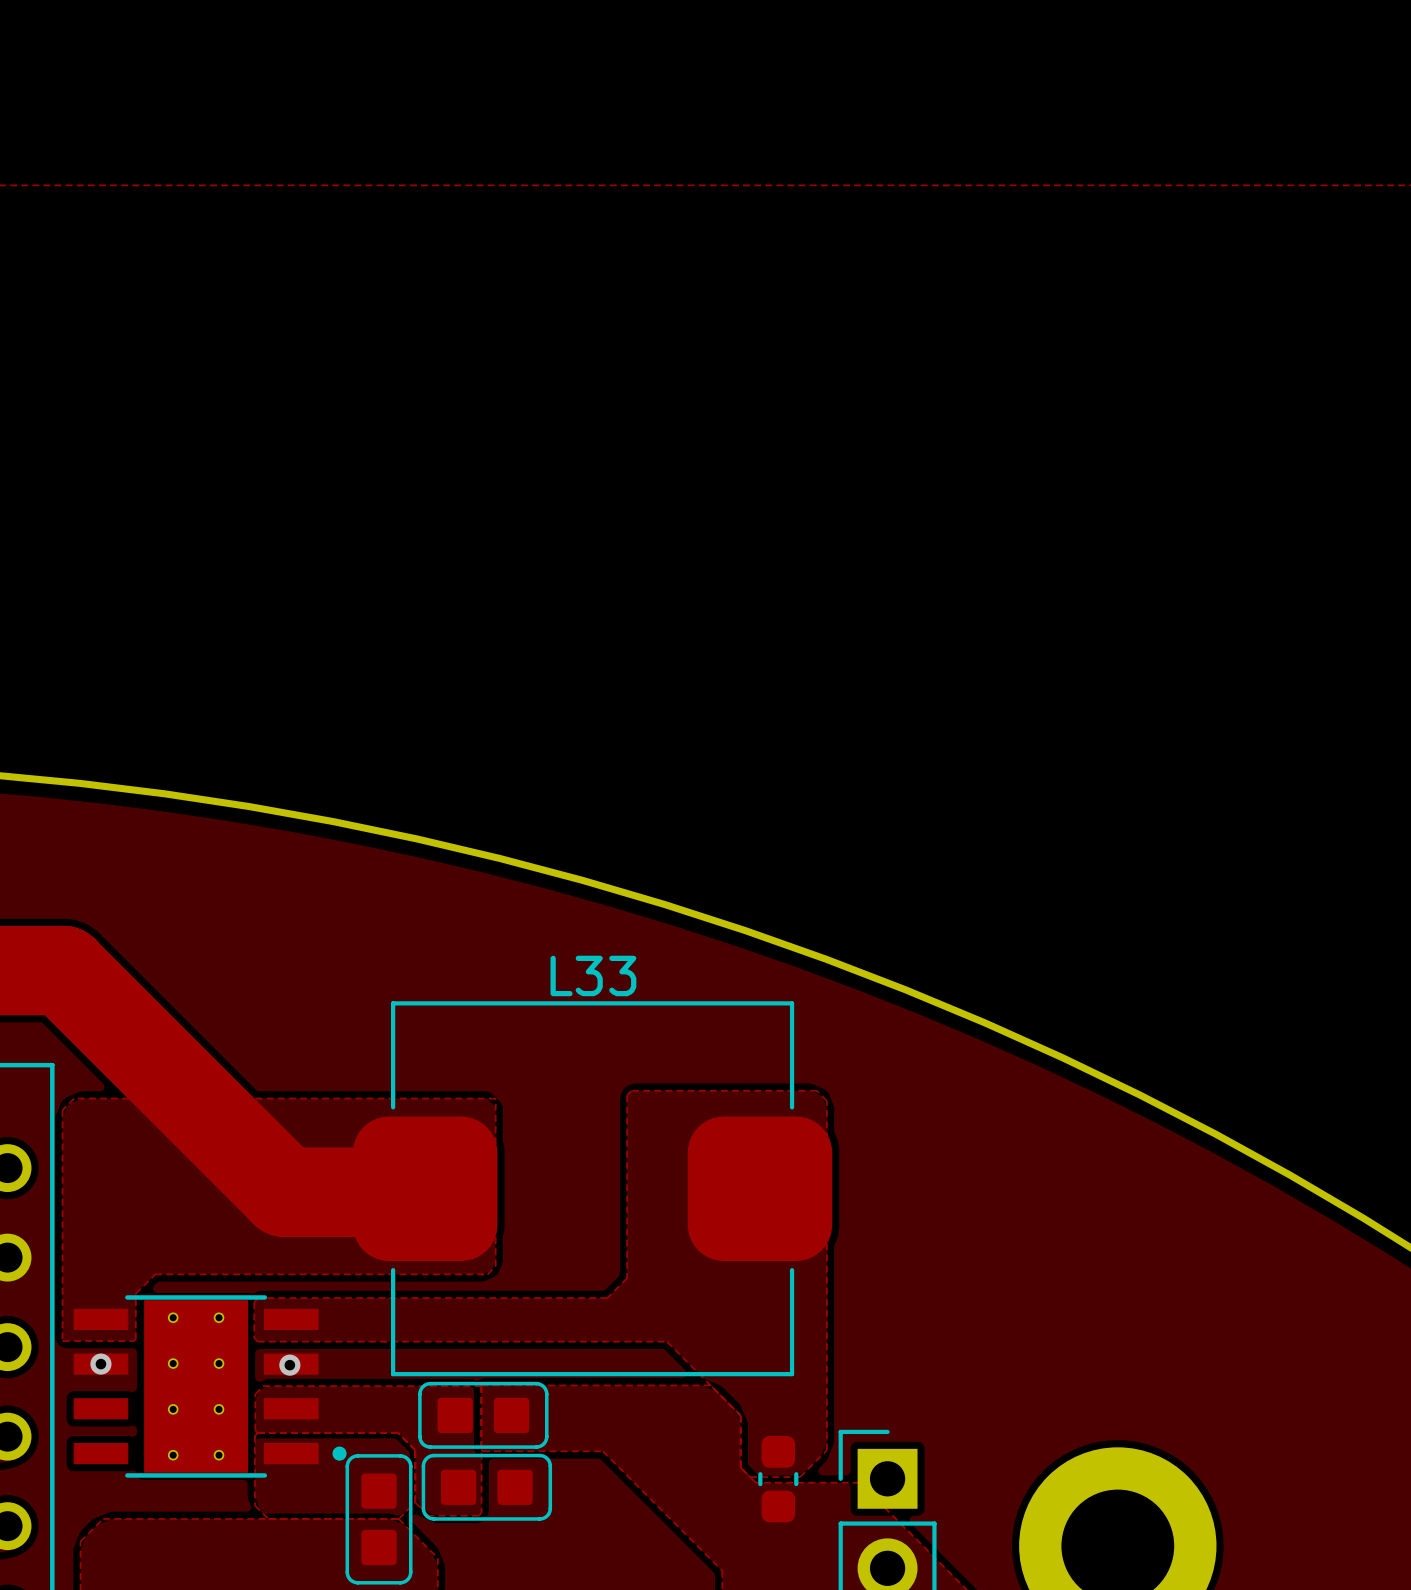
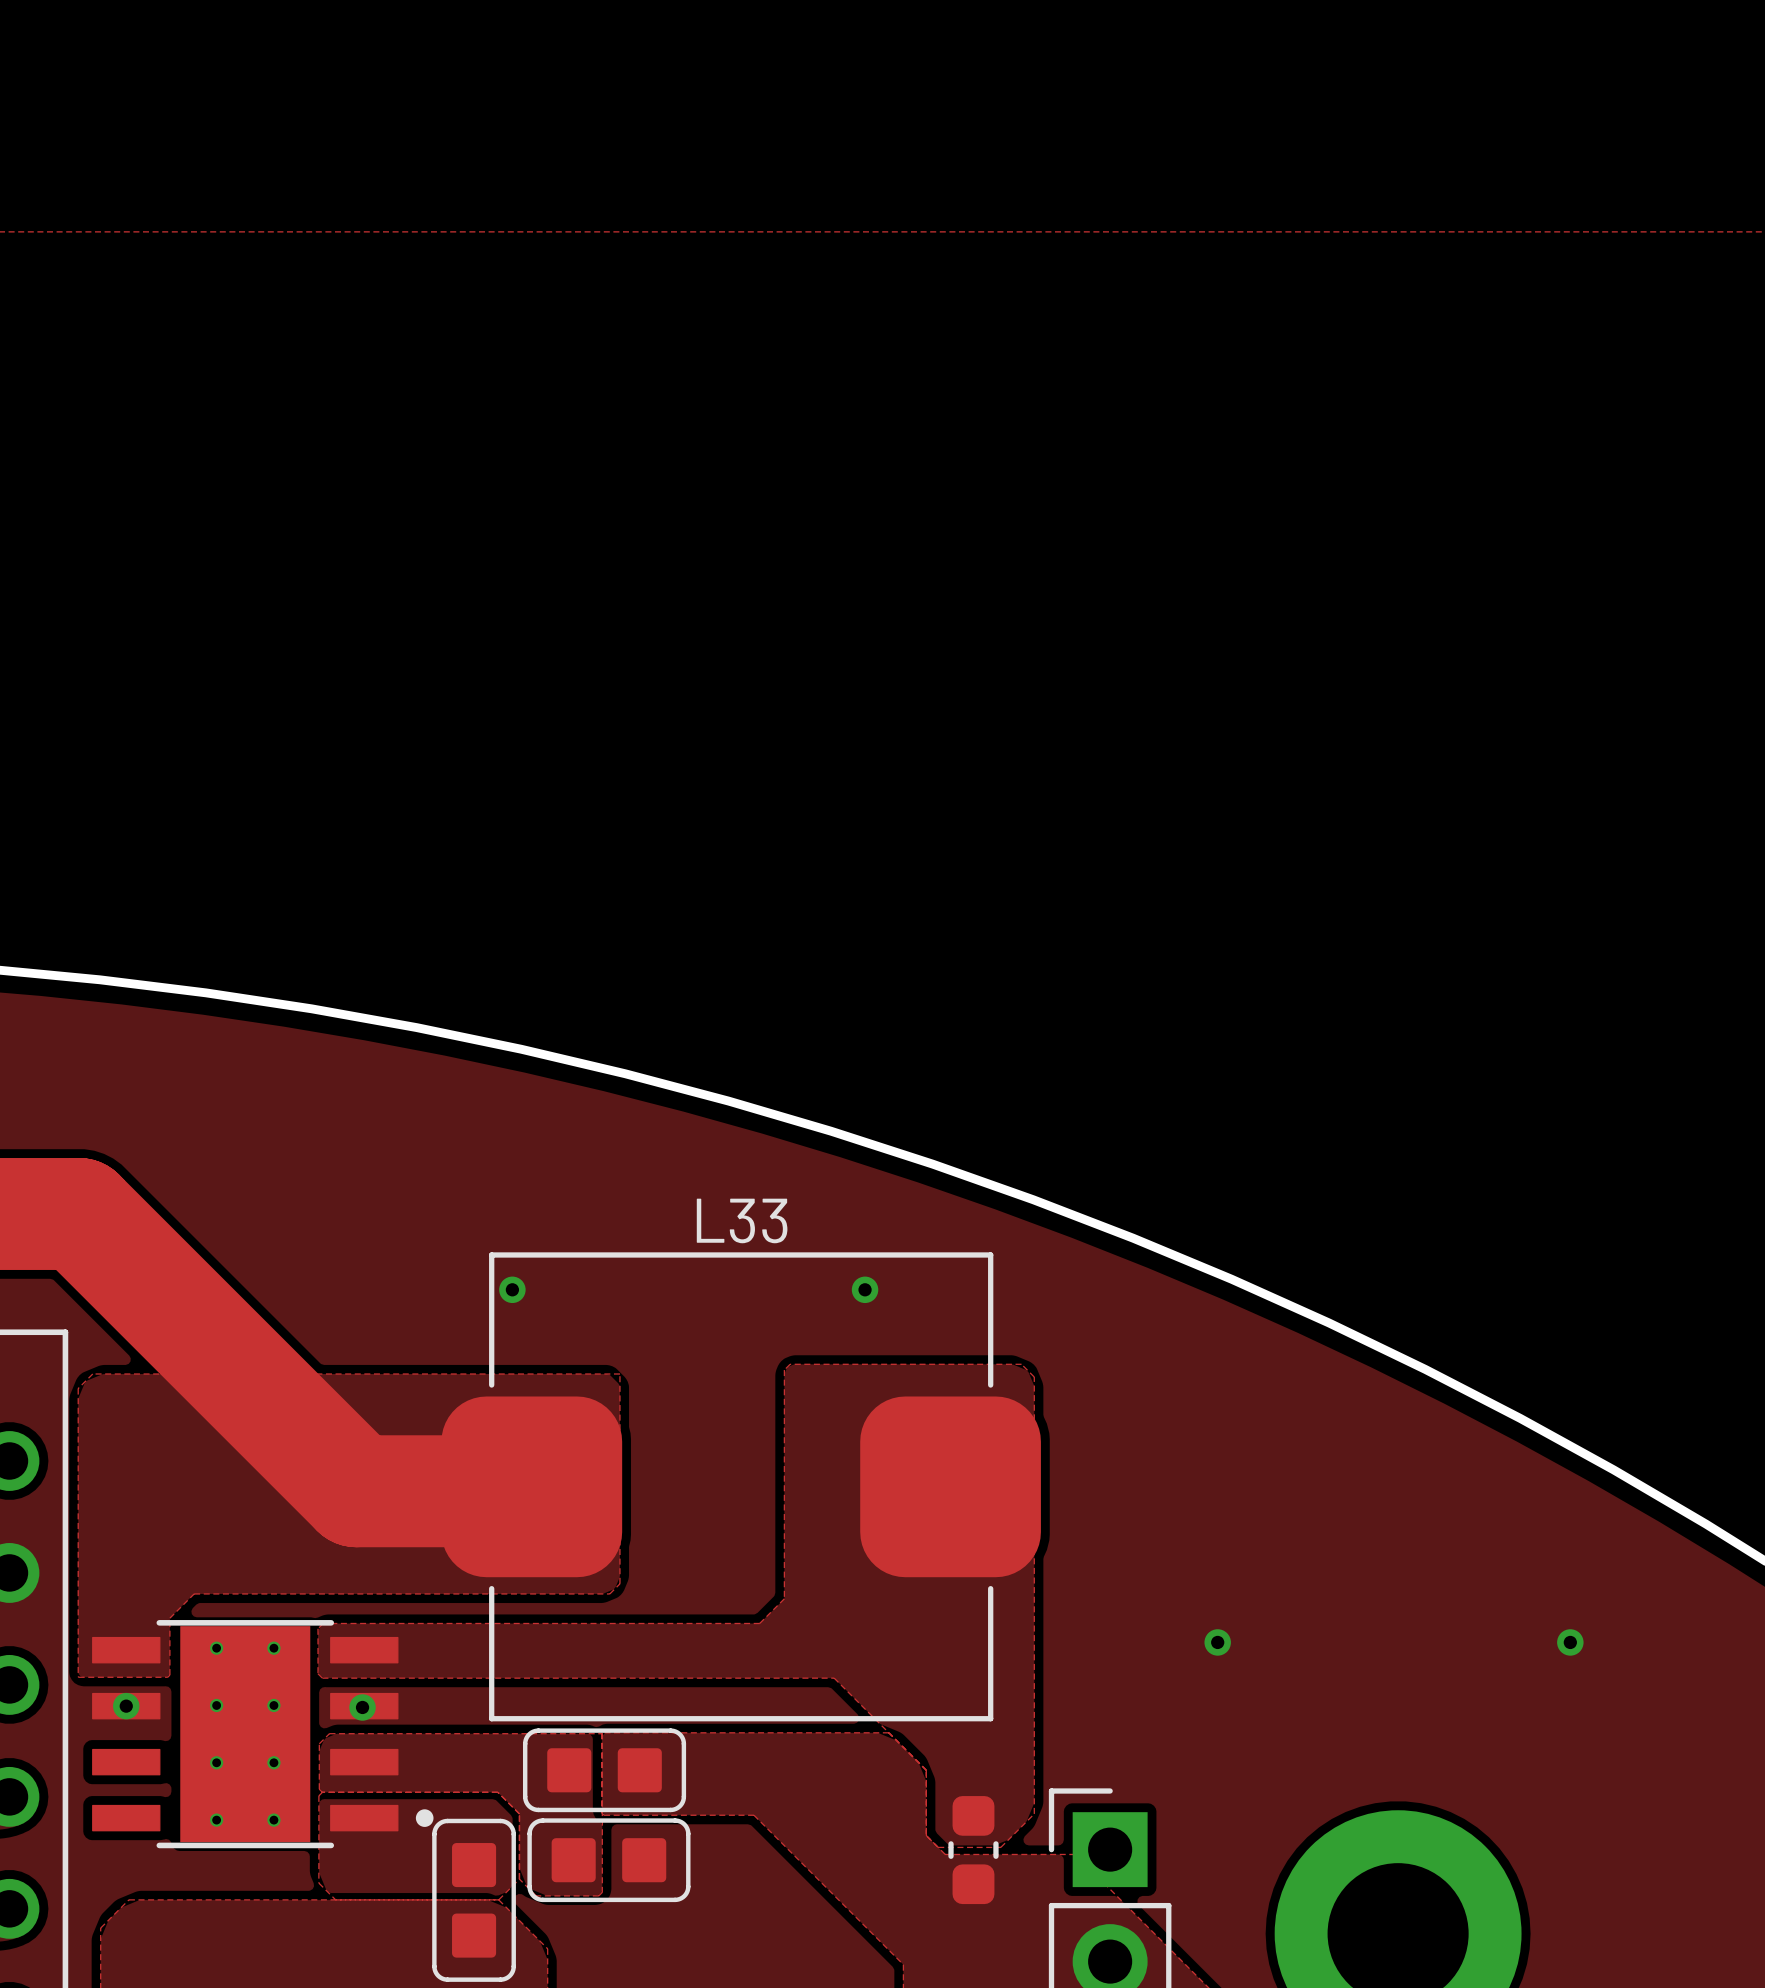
via: none -> (512, 1289)
via: none -> (865, 1289)
via: none -> (1217, 1642)
via: none -> (1570, 1642)

